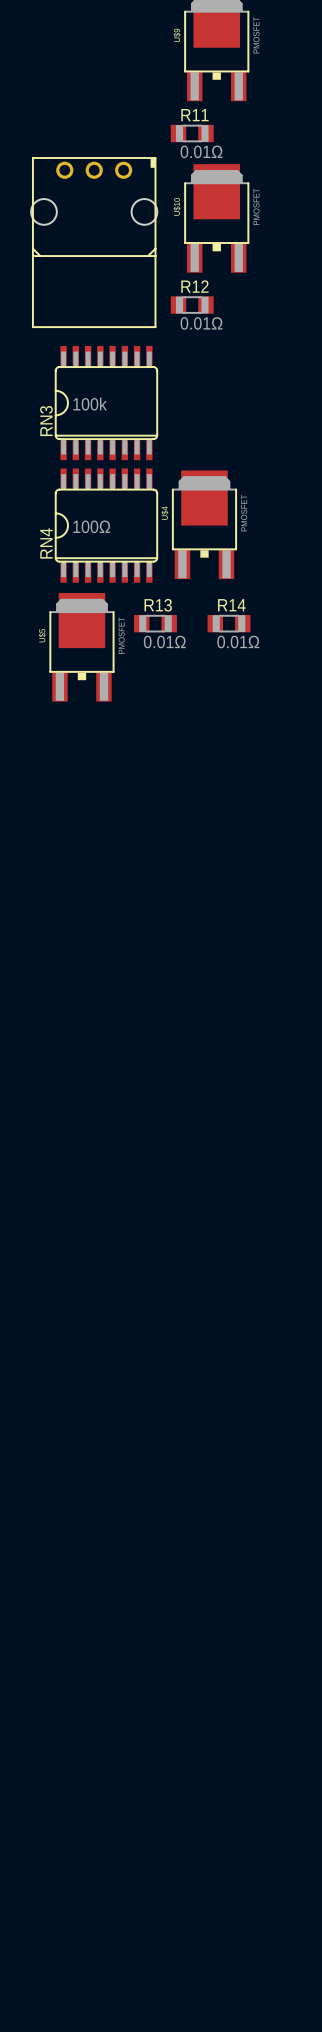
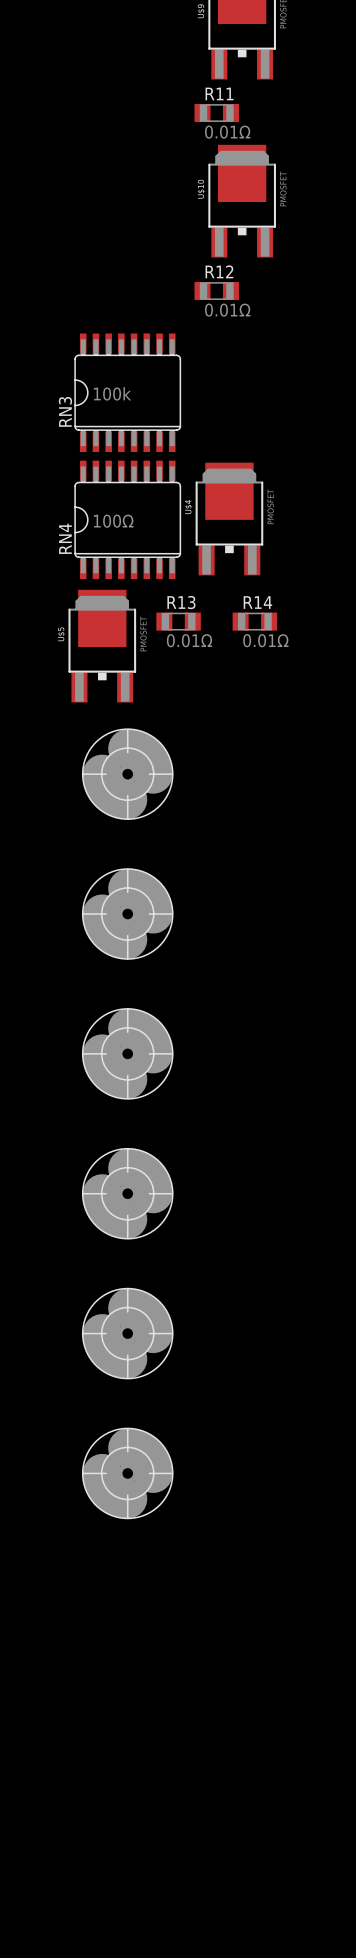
part: (94, 242) -> none
part: none -> (127, 774)
part: none -> (127, 914)
part: none -> (127, 1053)
part: none -> (127, 1193)
part: none -> (127, 1333)
part: none -> (127, 1473)

